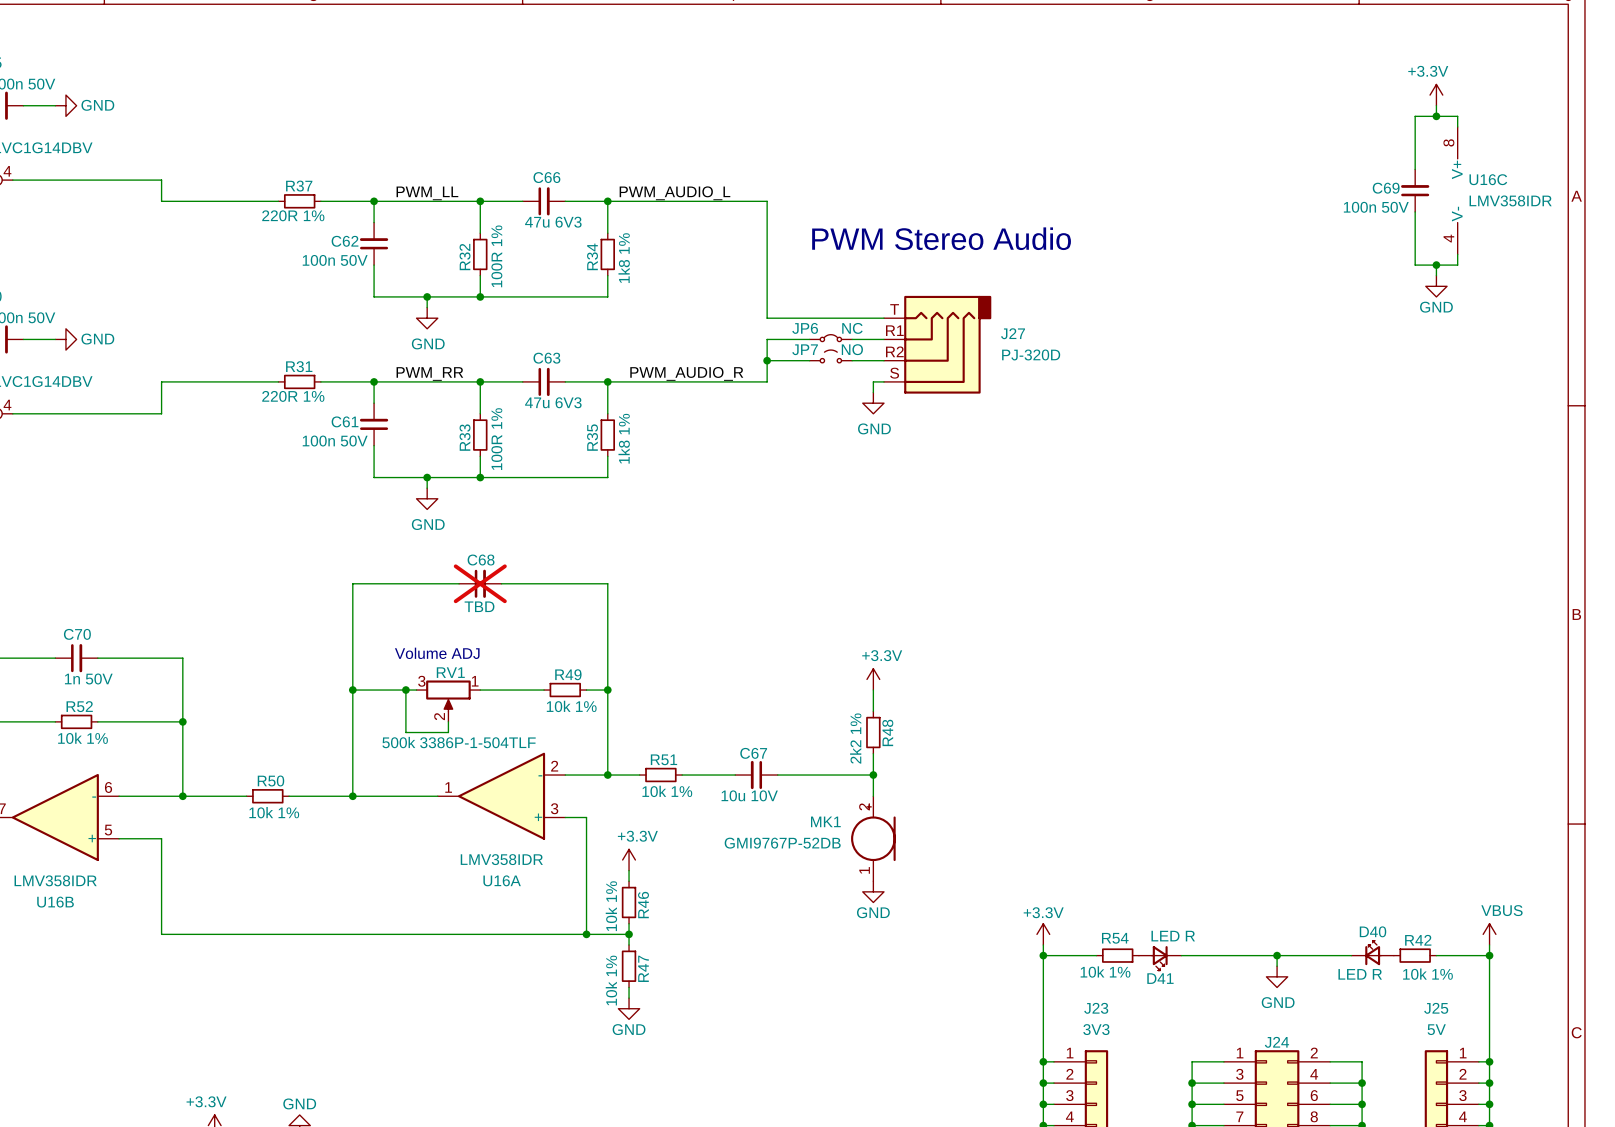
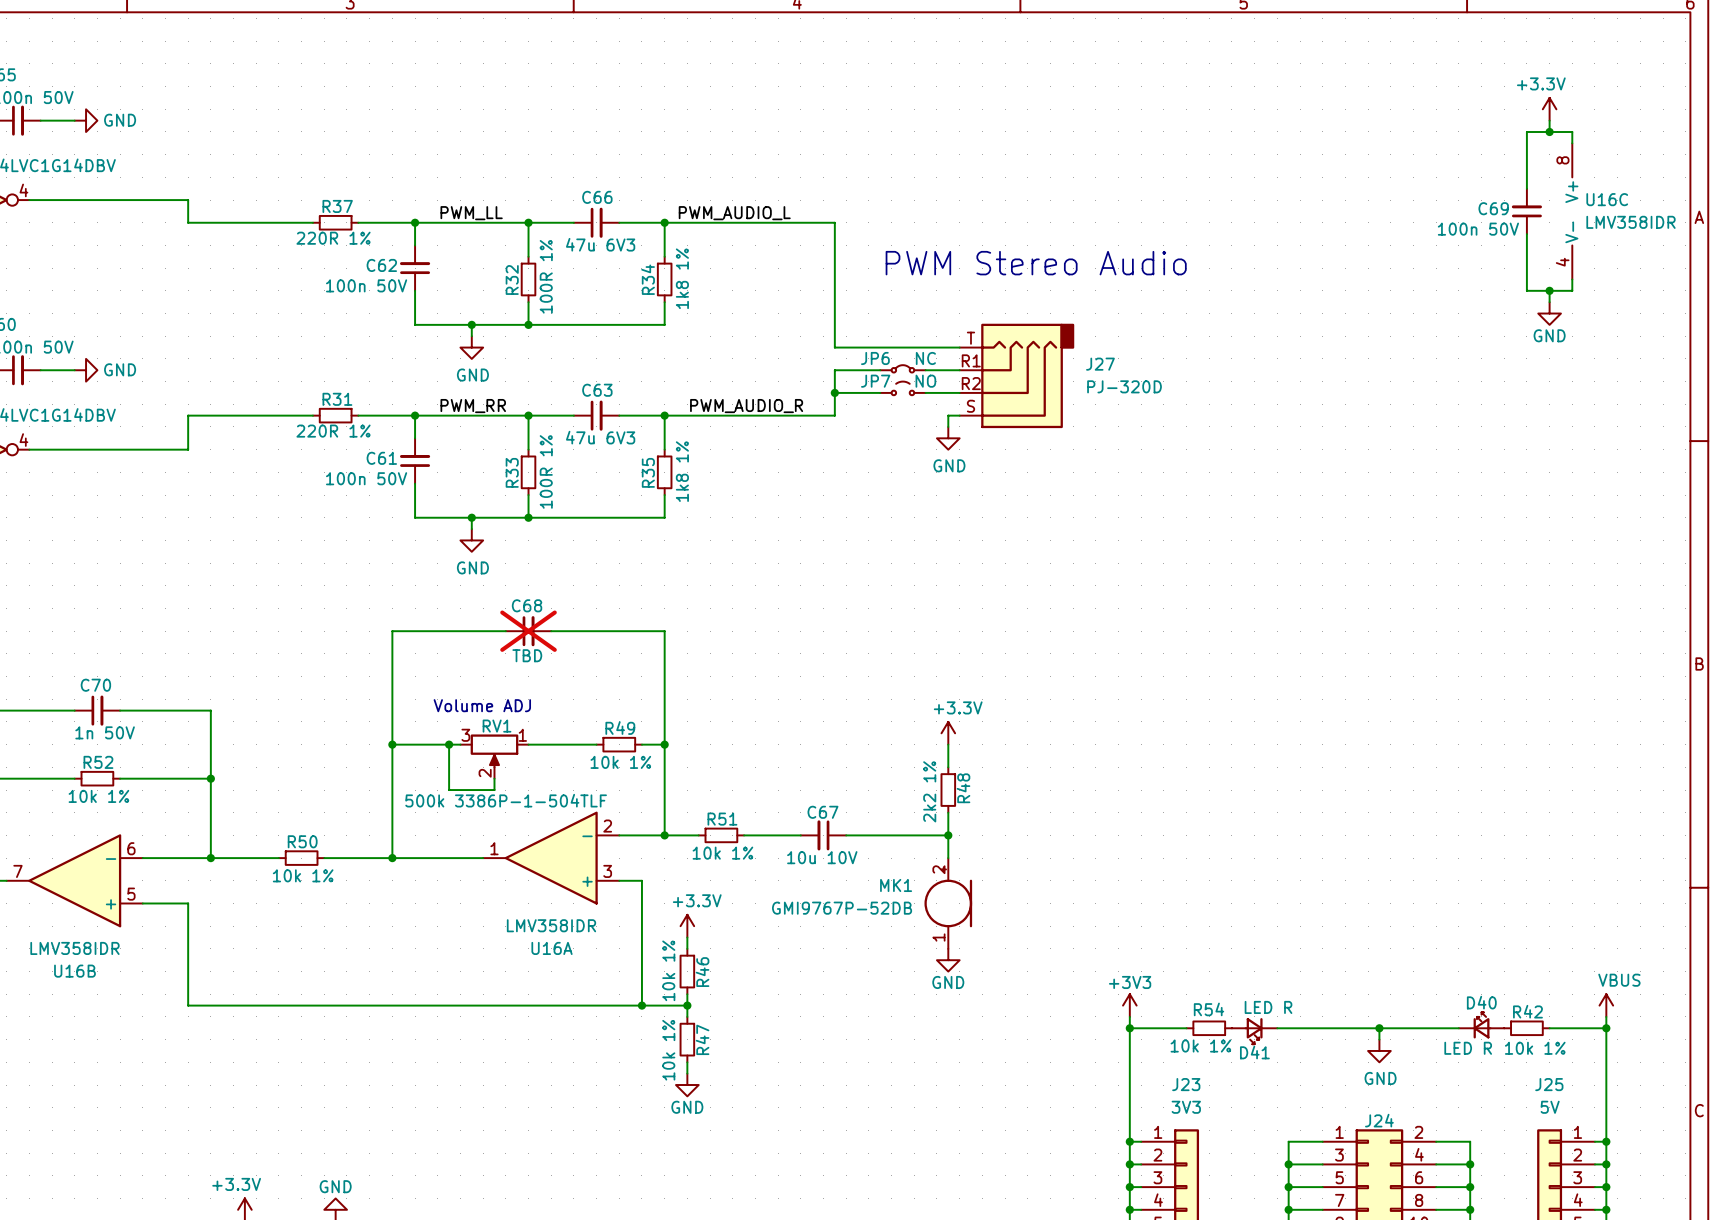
power symbol: +3.3V (1043, 934) -> +3V3 (1129, 1005)

